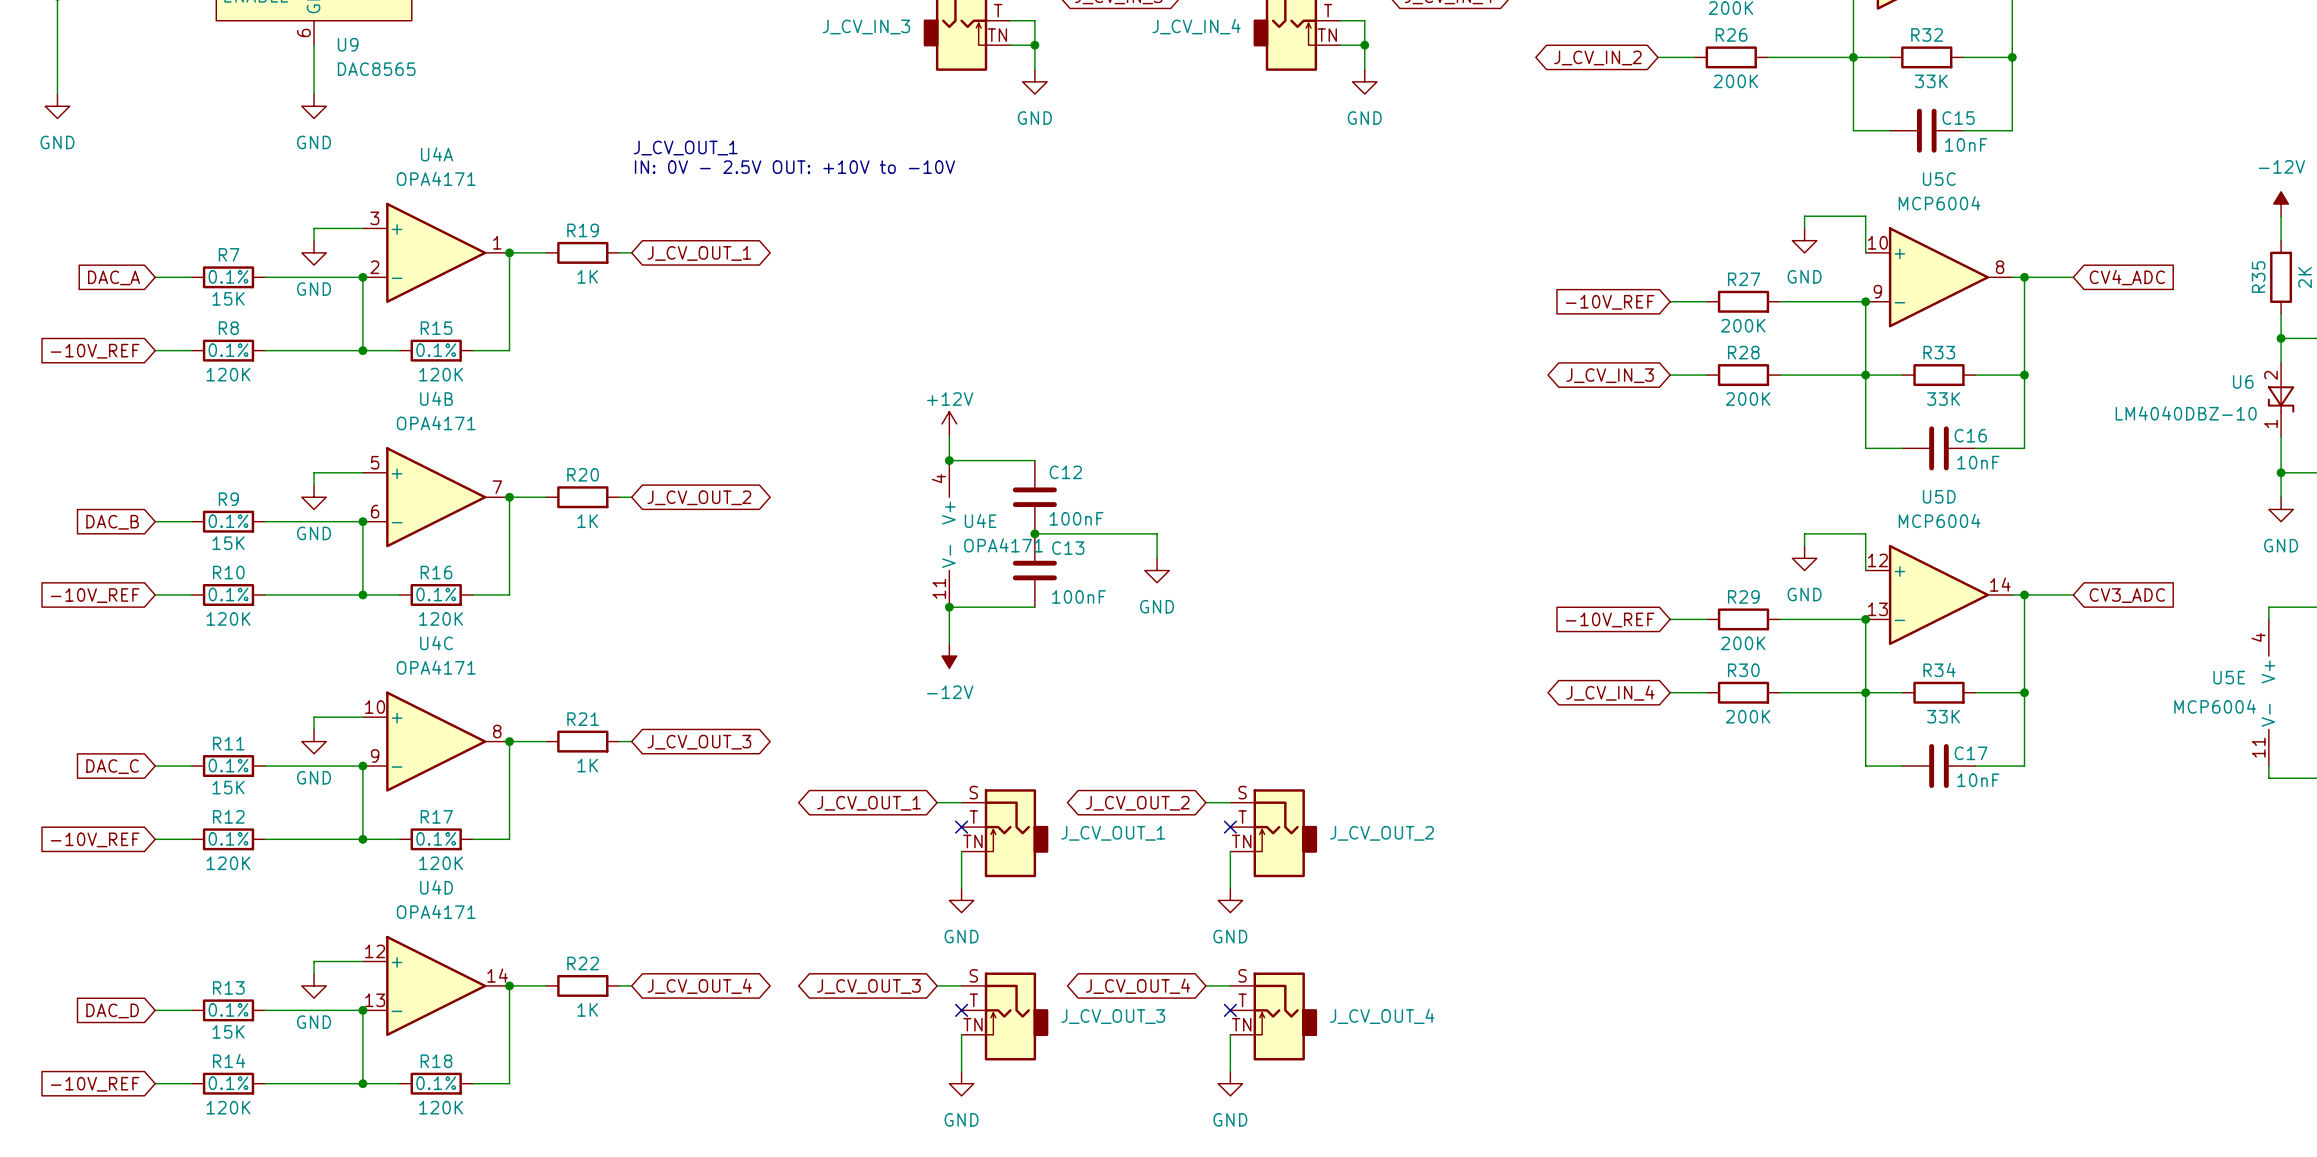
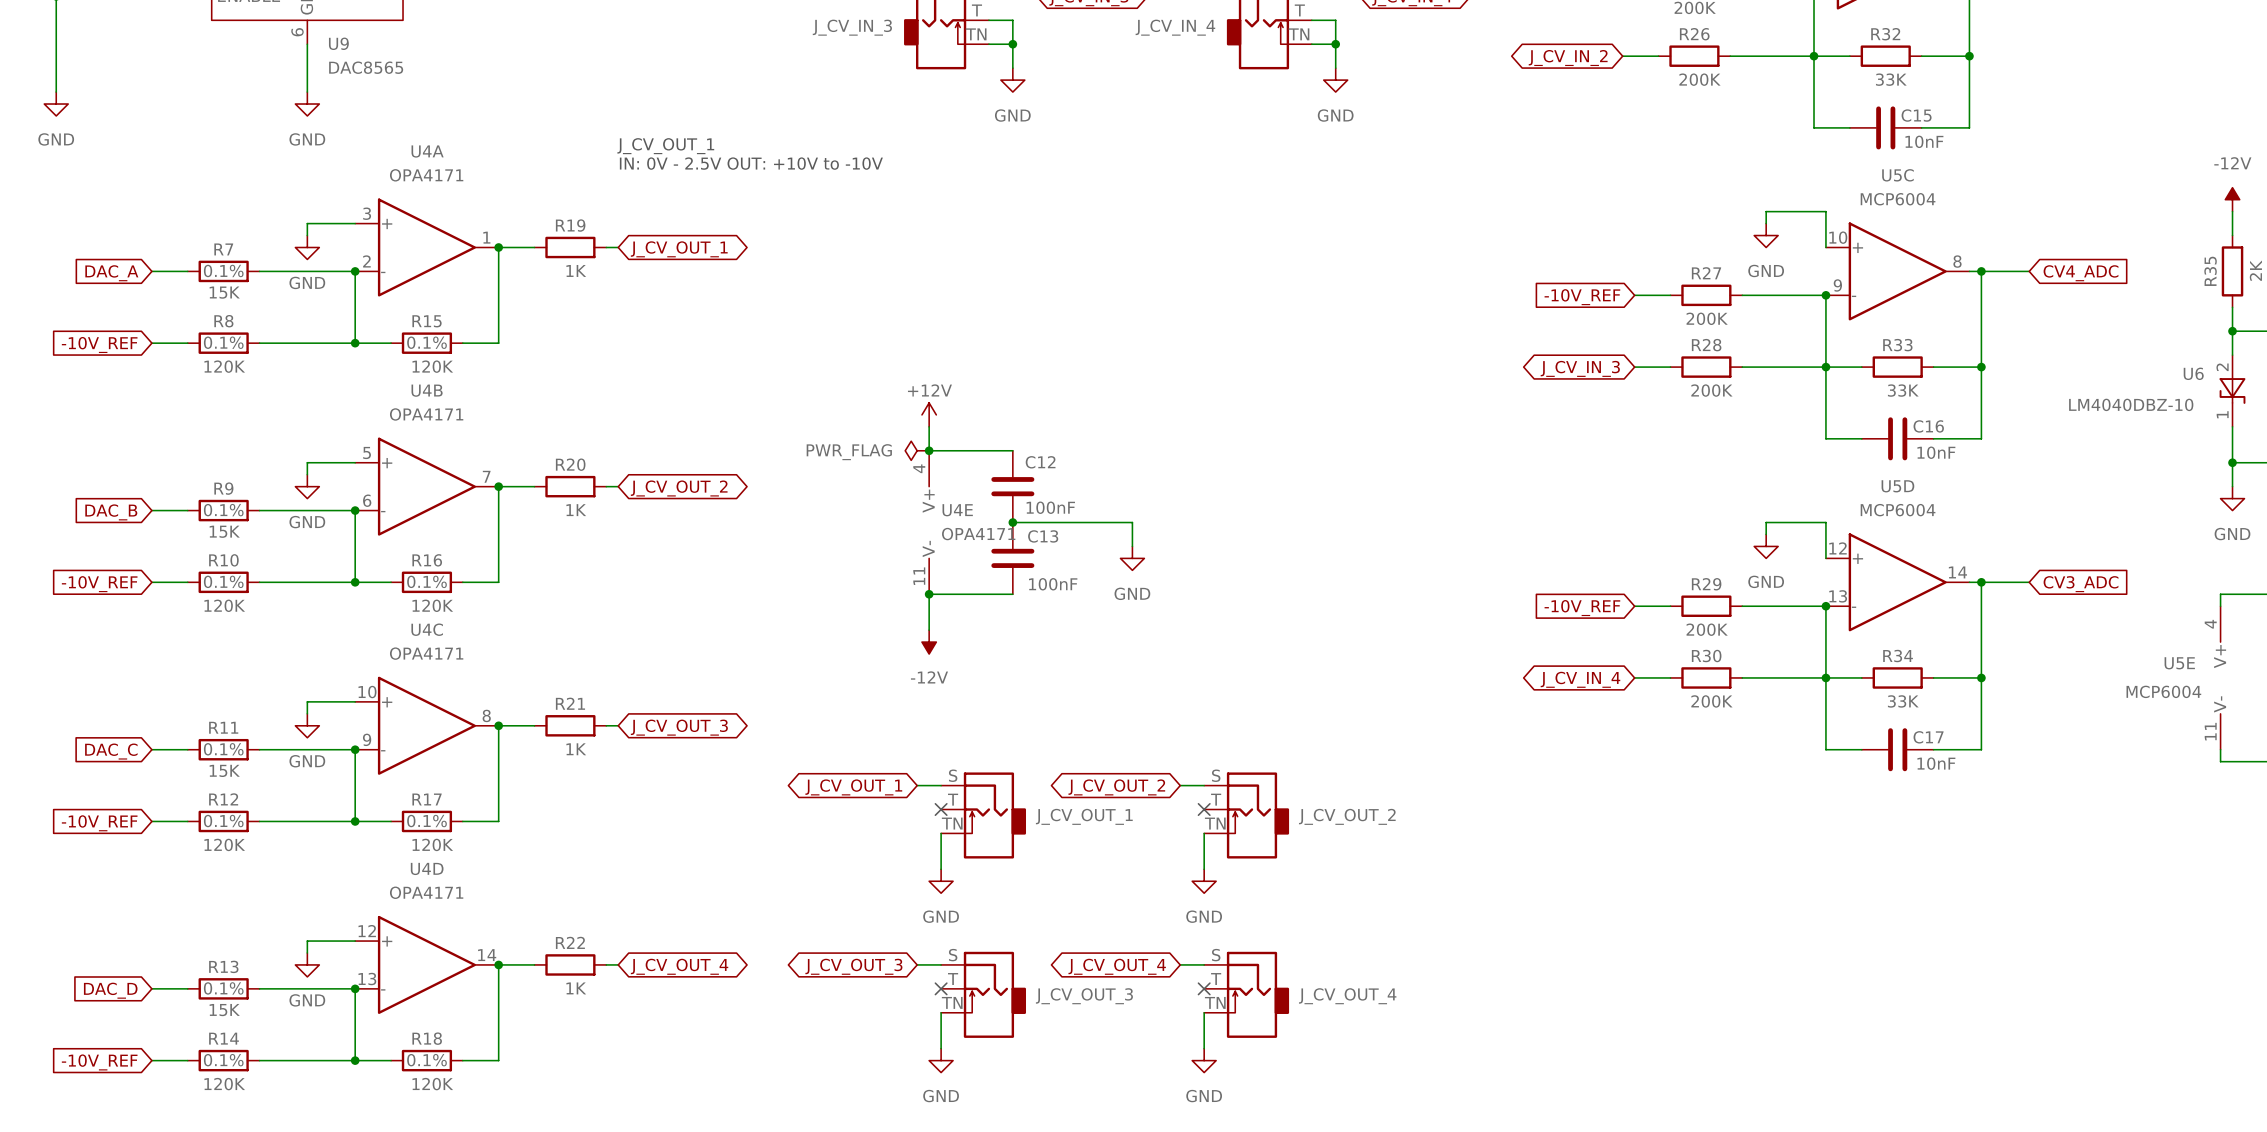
power symbol: none -> PWR_FLAG (917, 450)

